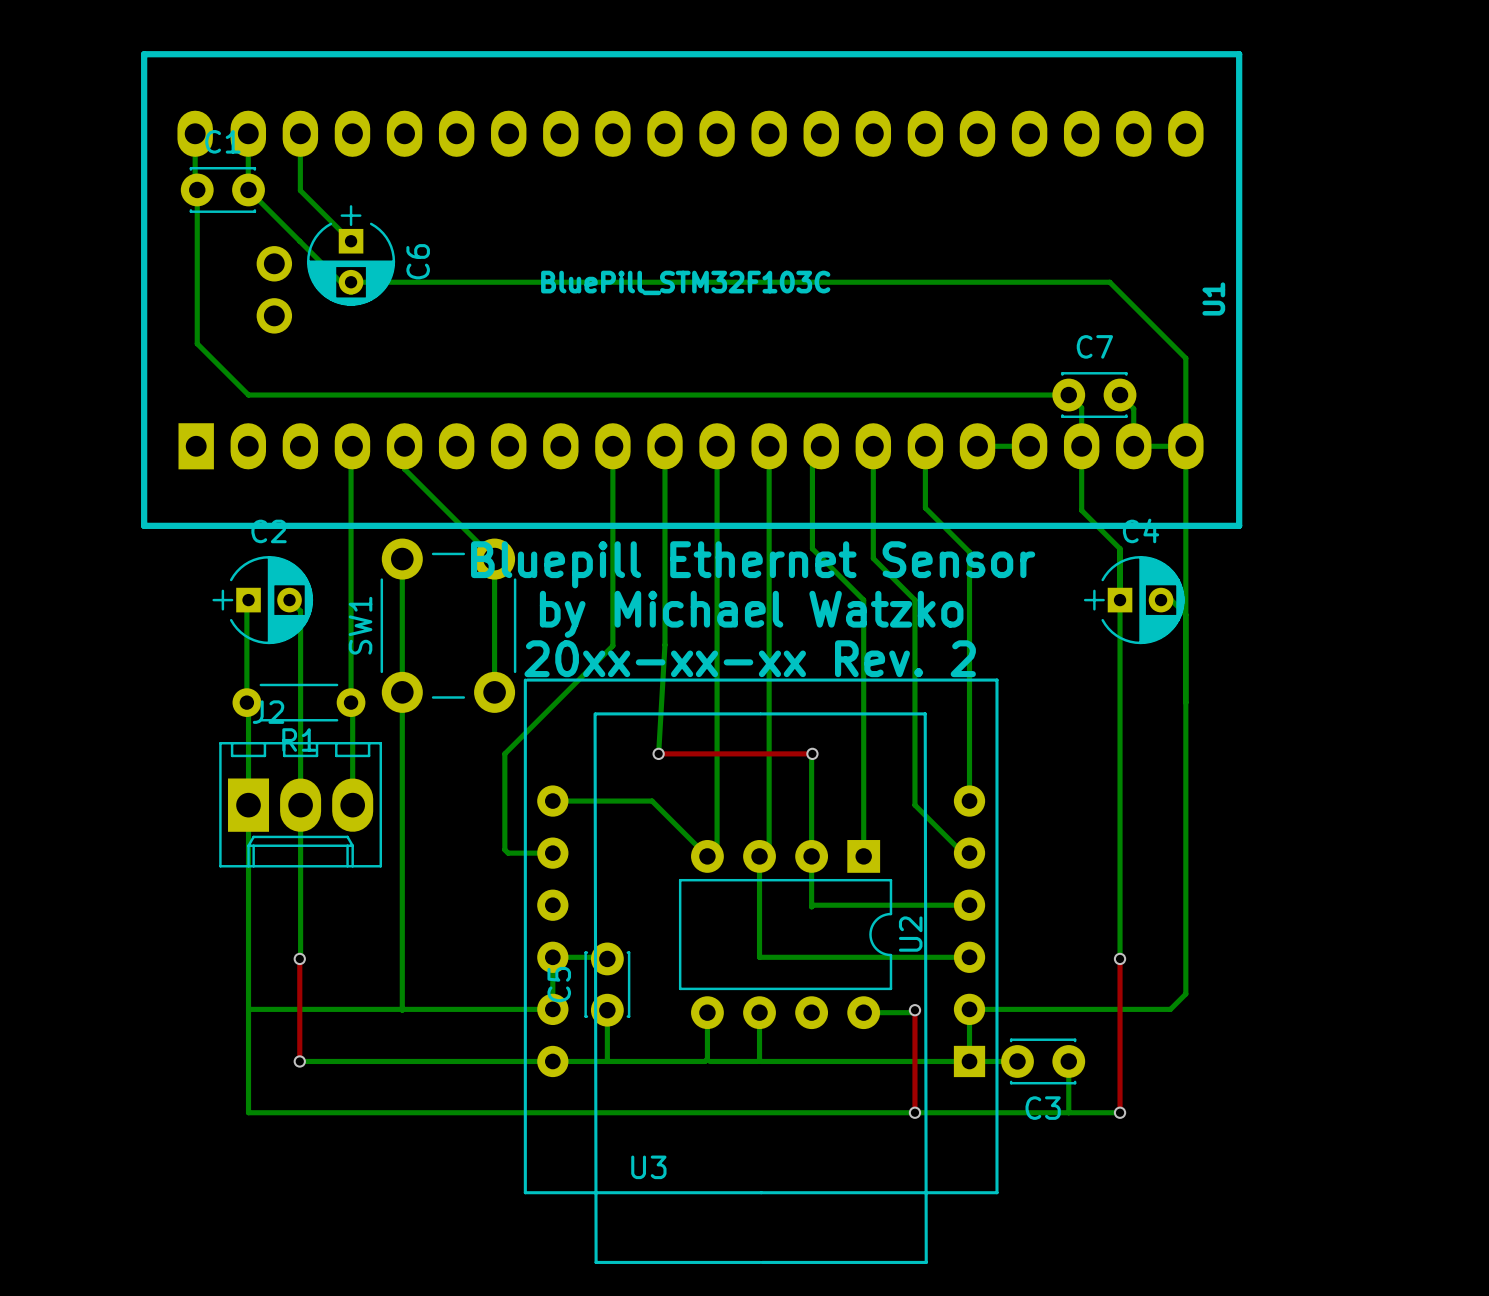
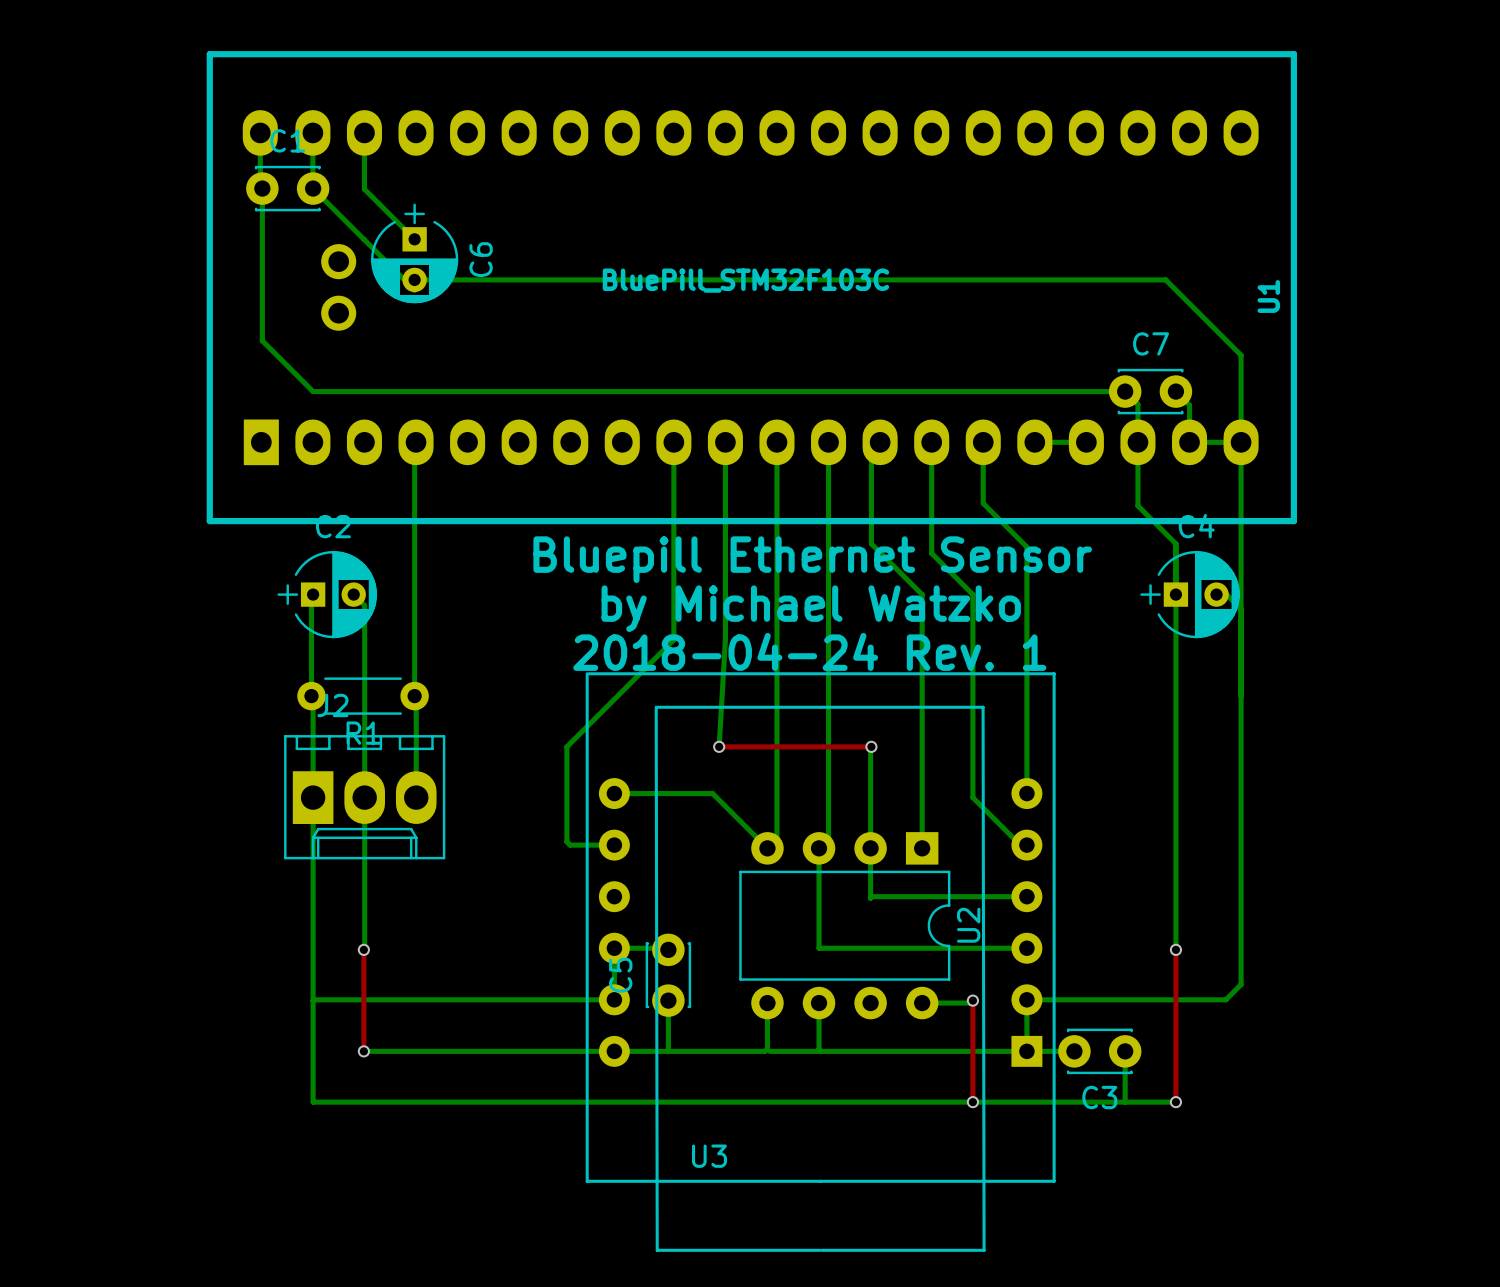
bottom track: (404, 446) (404, 469) (494, 559) (494, 692) -> none
bottom track: (402, 559) (402, 1010) -> none
SW1: (448, 625) -> none
text: 20xx-xx-xx Rev. 2 (750, 658) -> 2018-04-24 Rev. 1 (809, 651)

